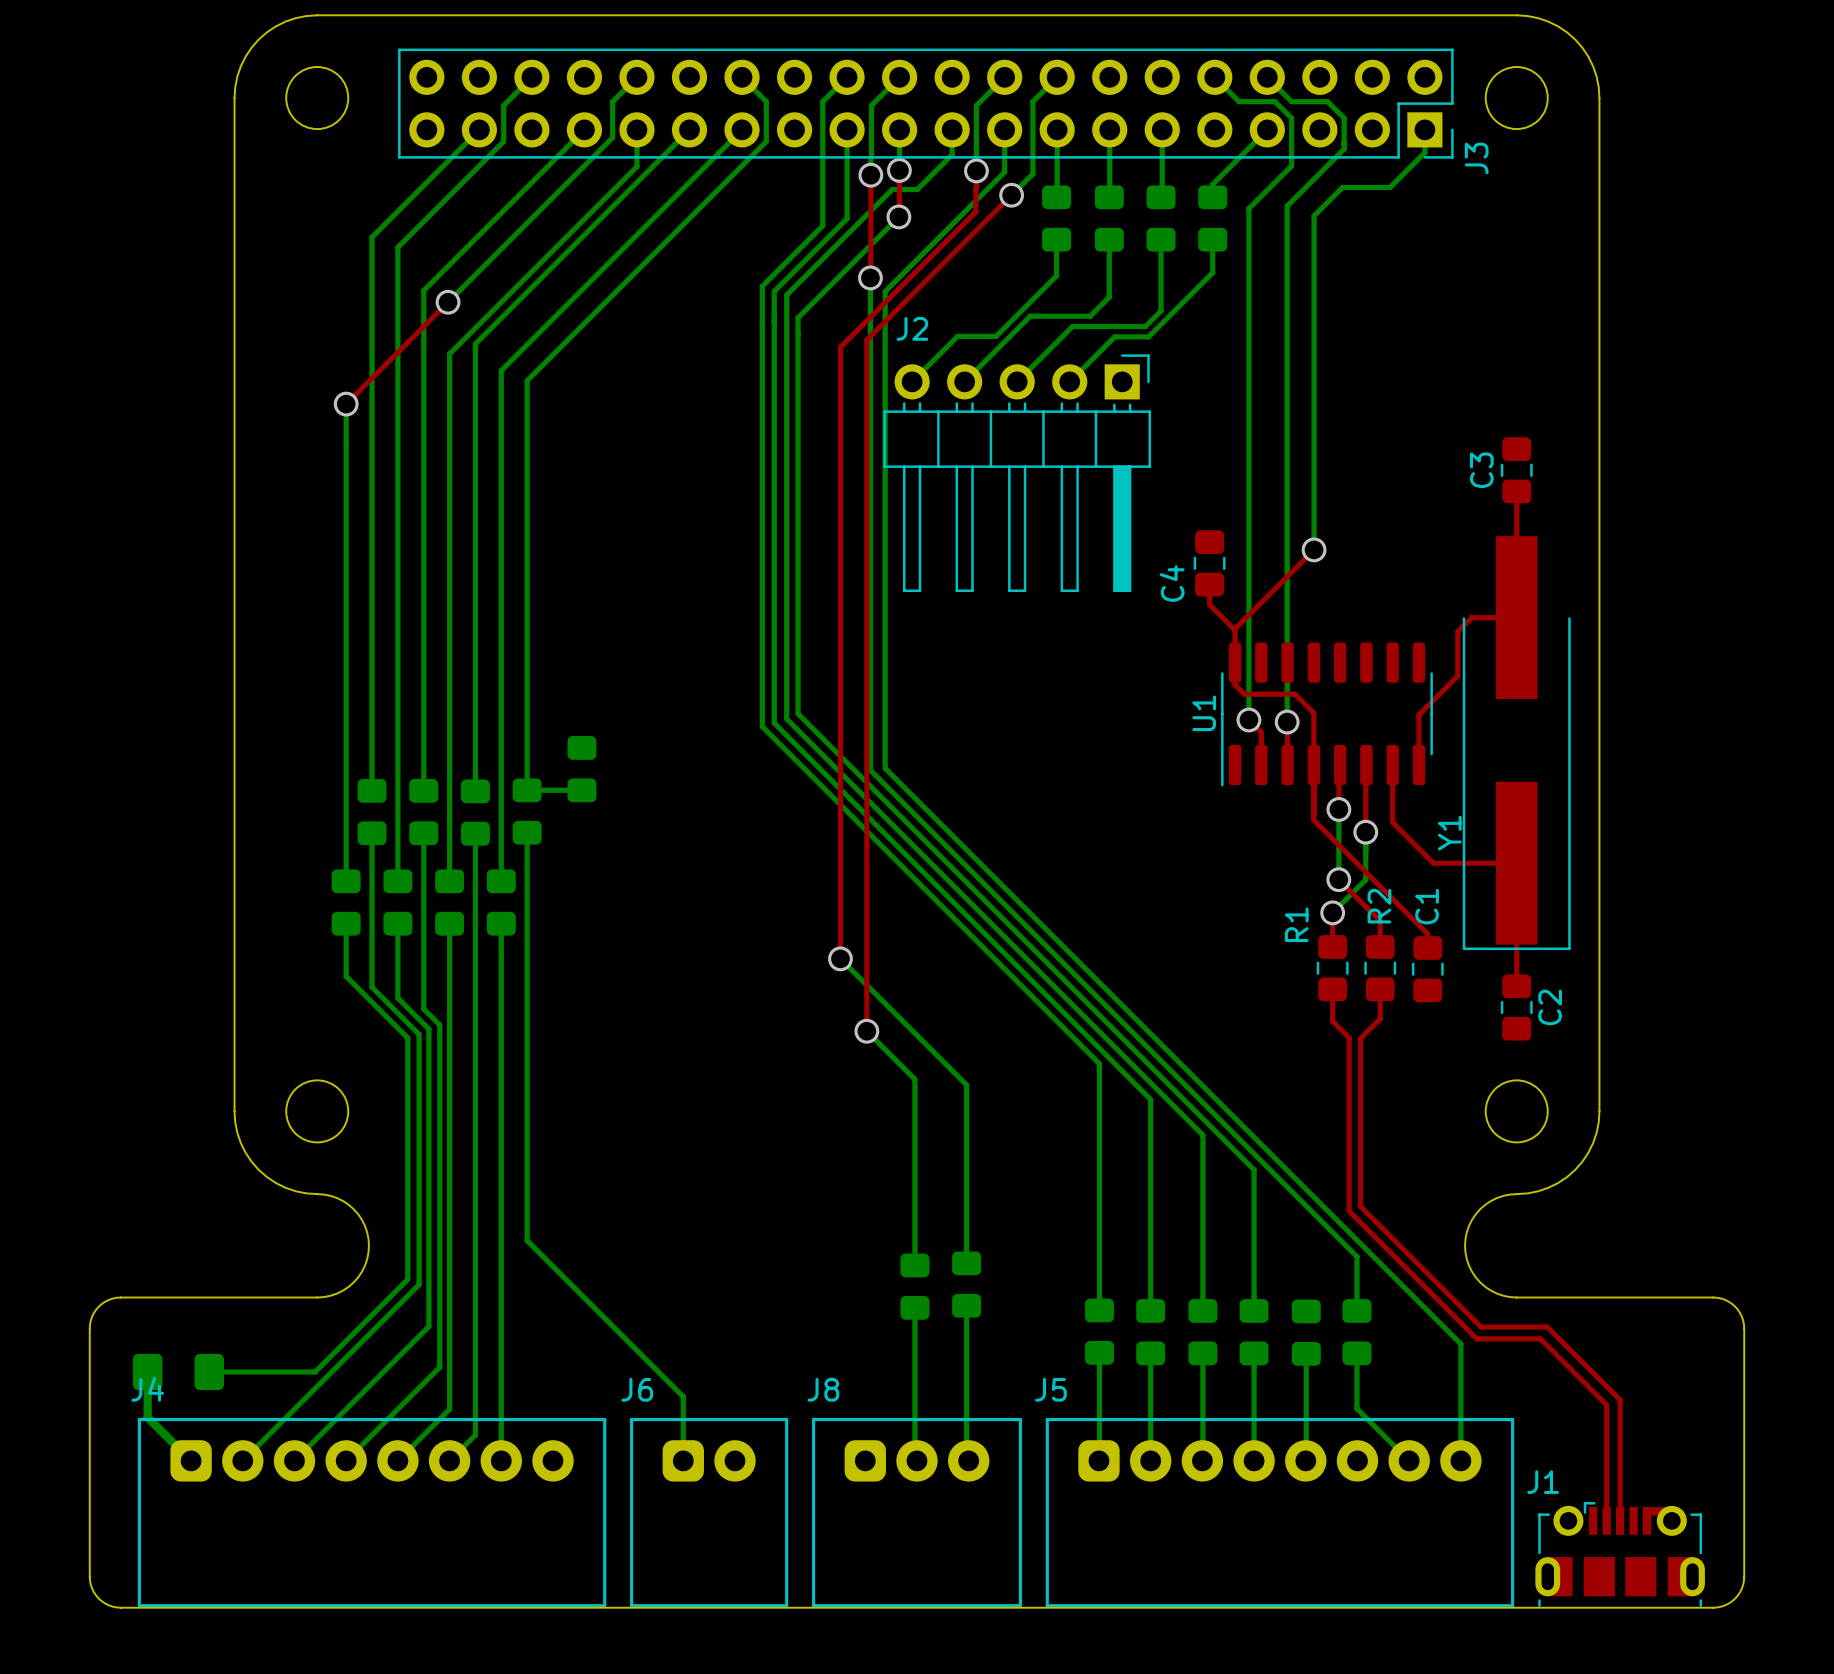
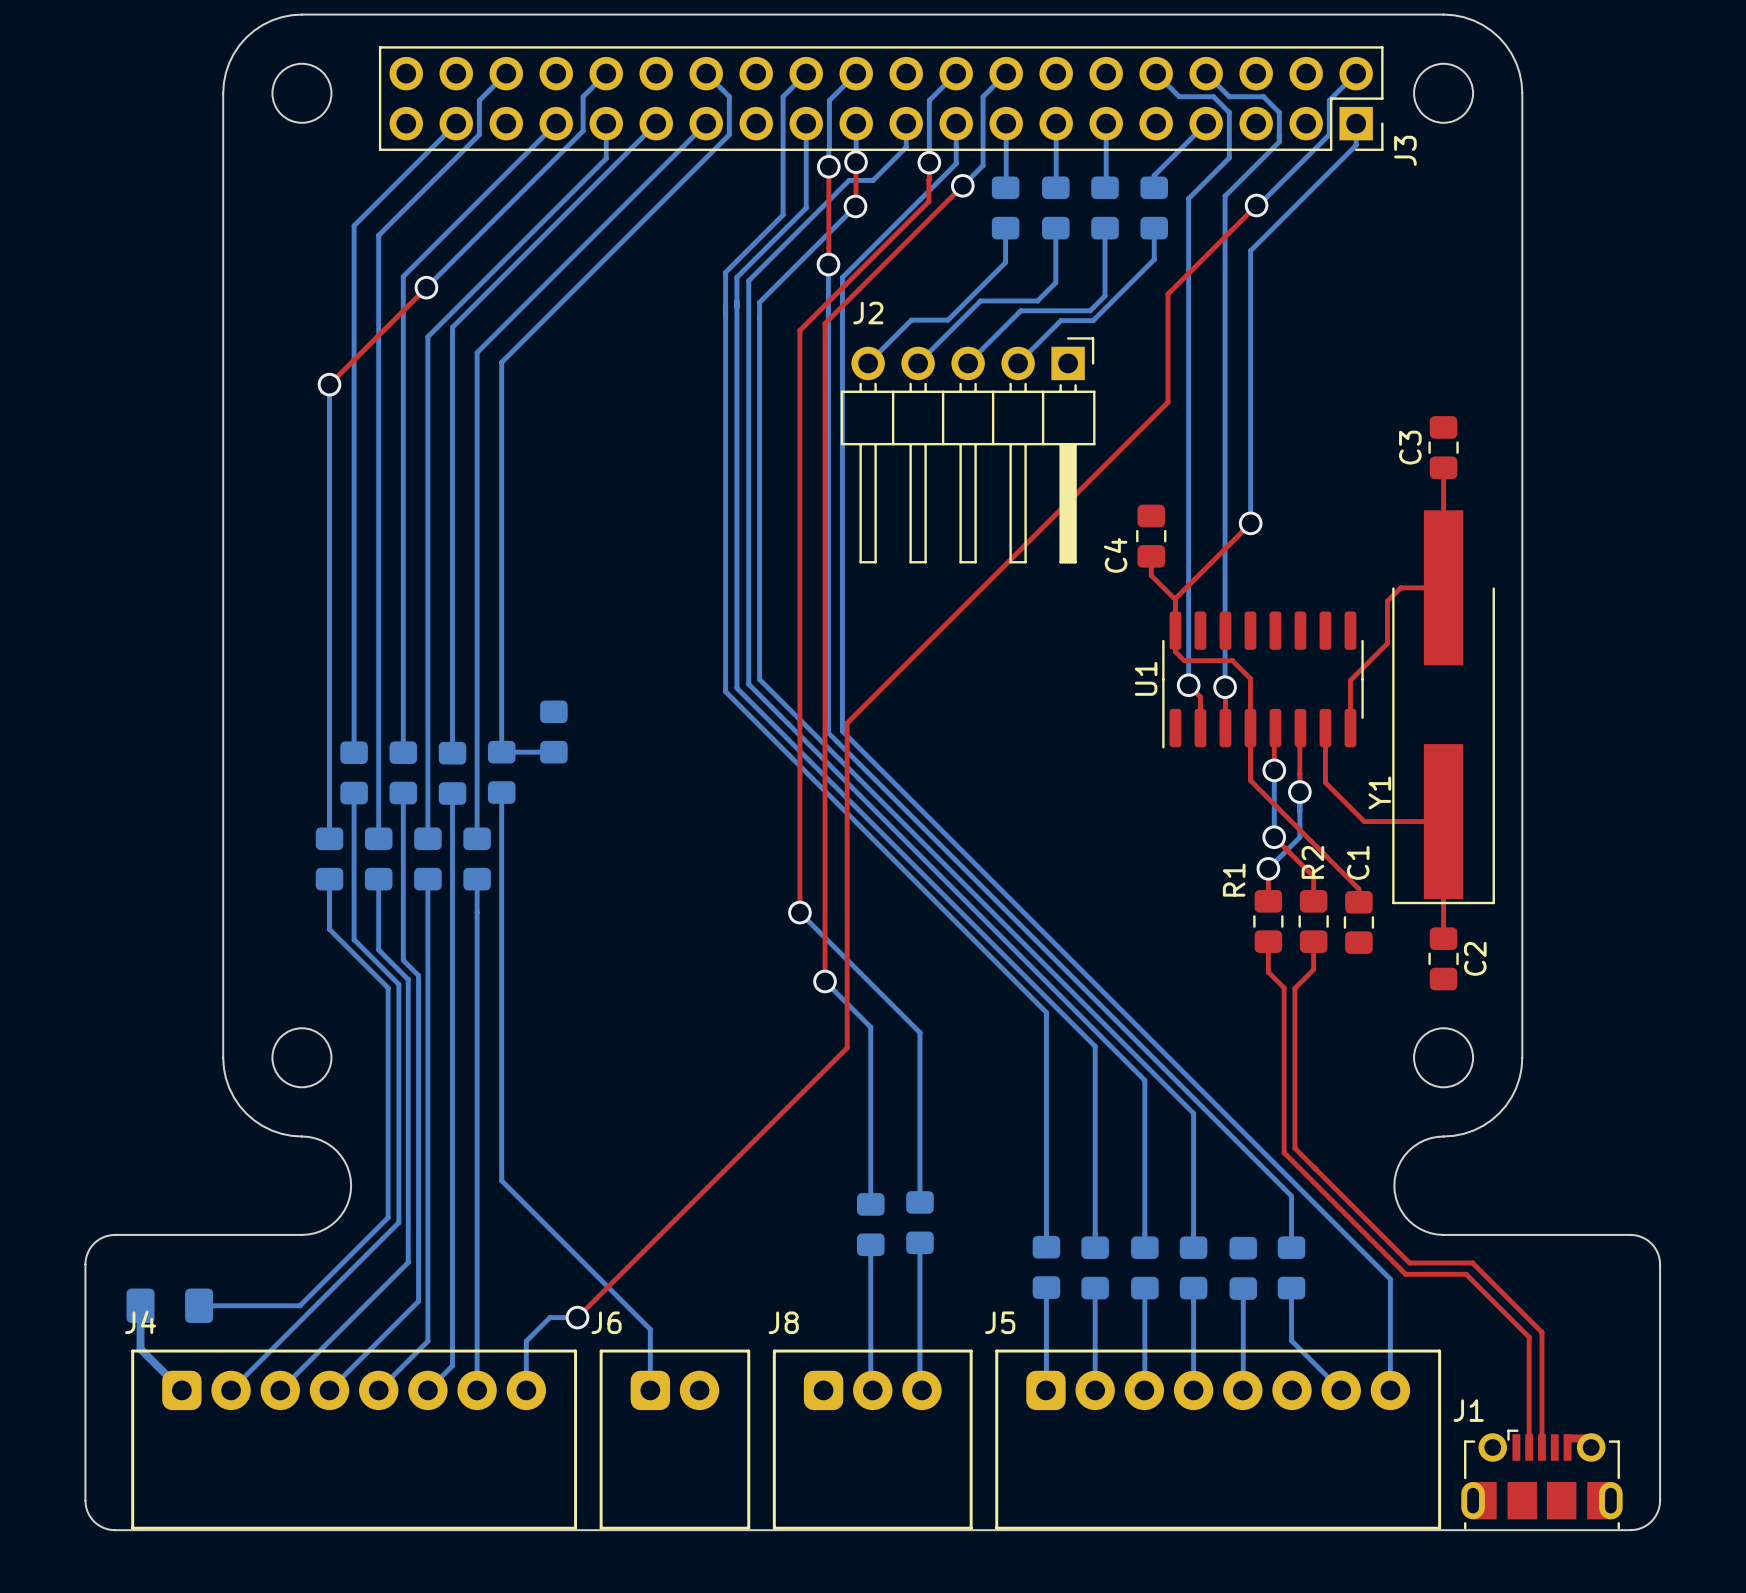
bottom track: none -> (1356, 73) (1329, 100) (1329, 134) (1256, 205)
bottom track: (1390, 187) (1342, 187) (1314, 215) (1314, 263) -> (1323, 178) (1250, 250)
top track: none -> (1256, 205) (1168, 294) (1168, 402) (847, 723) (847, 1047) (577, 1317)
via: none -> (1256, 205)
bottom track: none -> (577, 1317) (549, 1317) (526, 1341) (526, 1390)
via: none -> (577, 1317)

